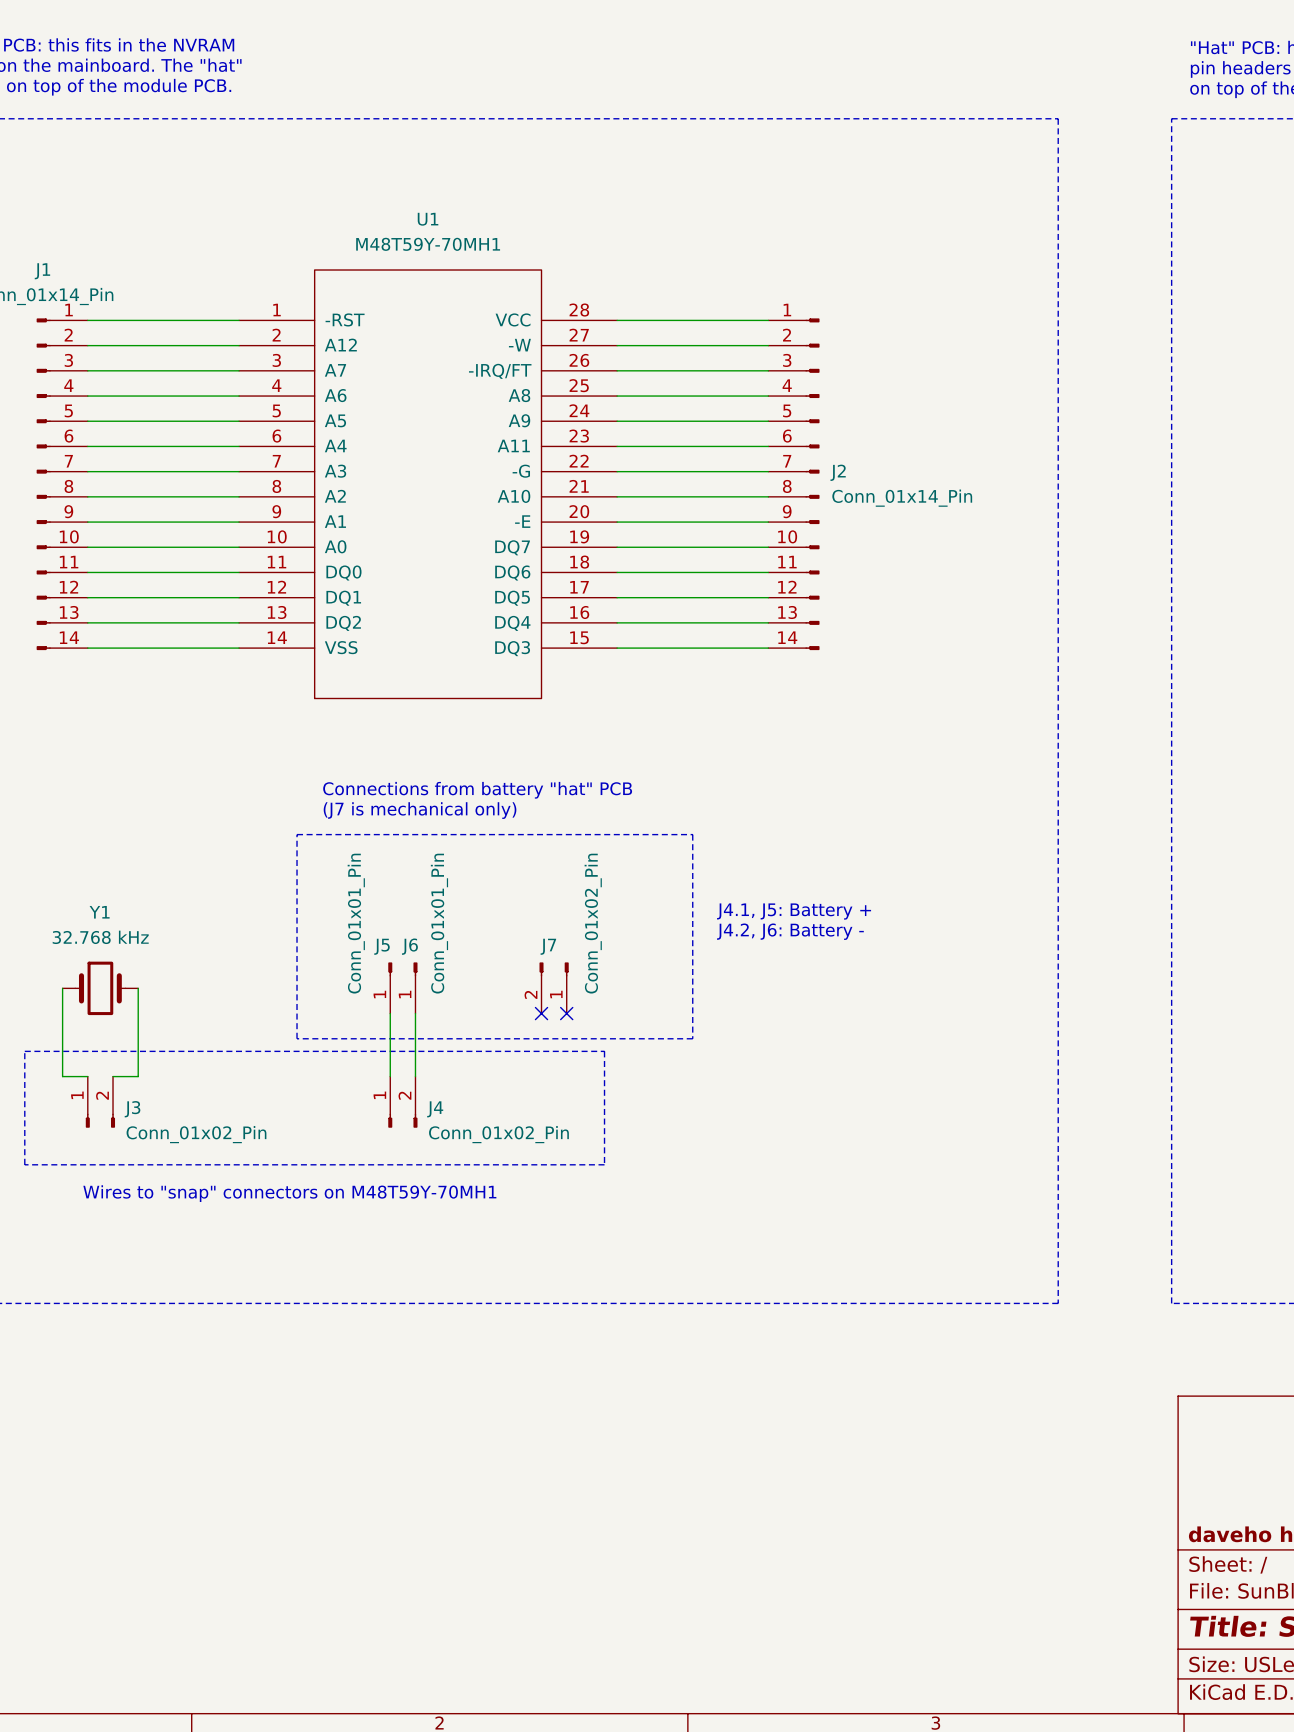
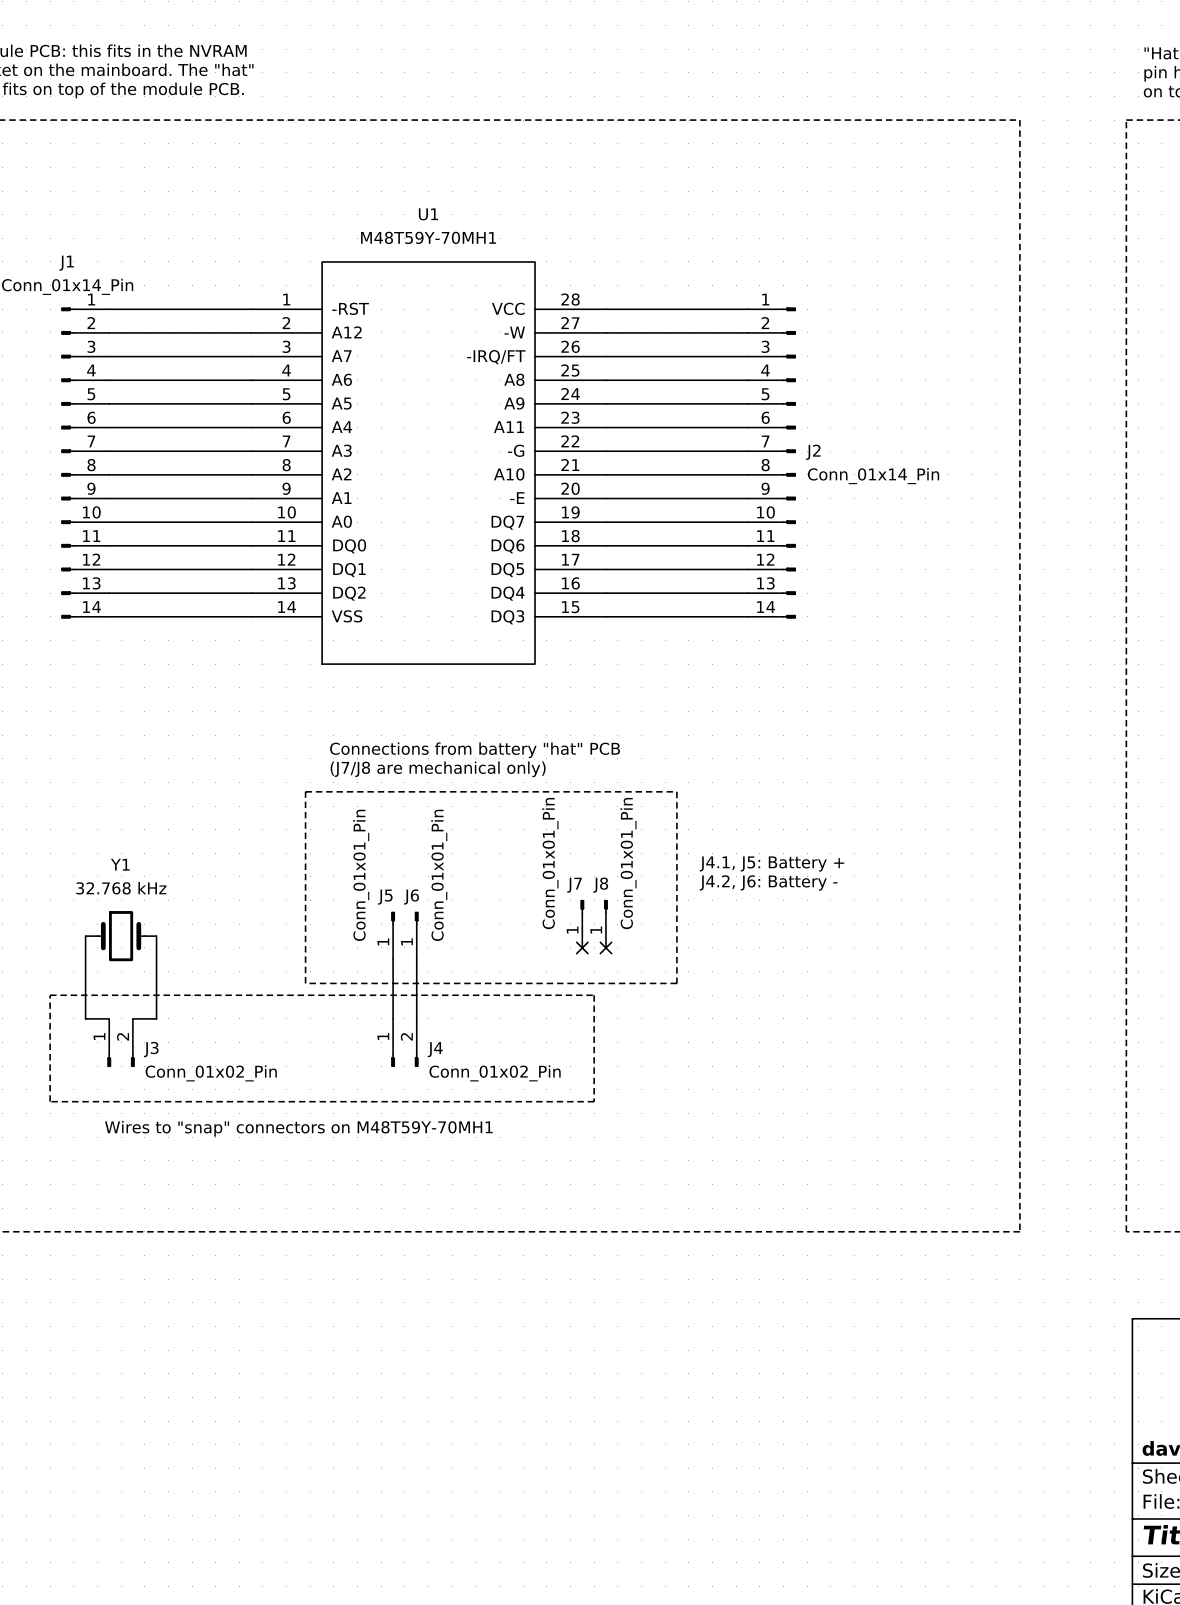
text: (J7 is mechanical only) (420, 810) -> (J7/J8 are mechanical only) (438, 769)
J7 value: Conn_01x02_Pin (593, 923) -> Conn_01x01_Pin (550, 863)
J7 symbol: [539, 962, 569, 1014] -> [580, 899, 585, 948]
J8: none -> Conn_01x01_Pin (605, 923)
no-connect mark: none -> (582, 947)
no-connect mark: none -> (605, 947)
no-connect mark: (541, 1013) -> none
no-connect mark: (566, 1013) -> none

